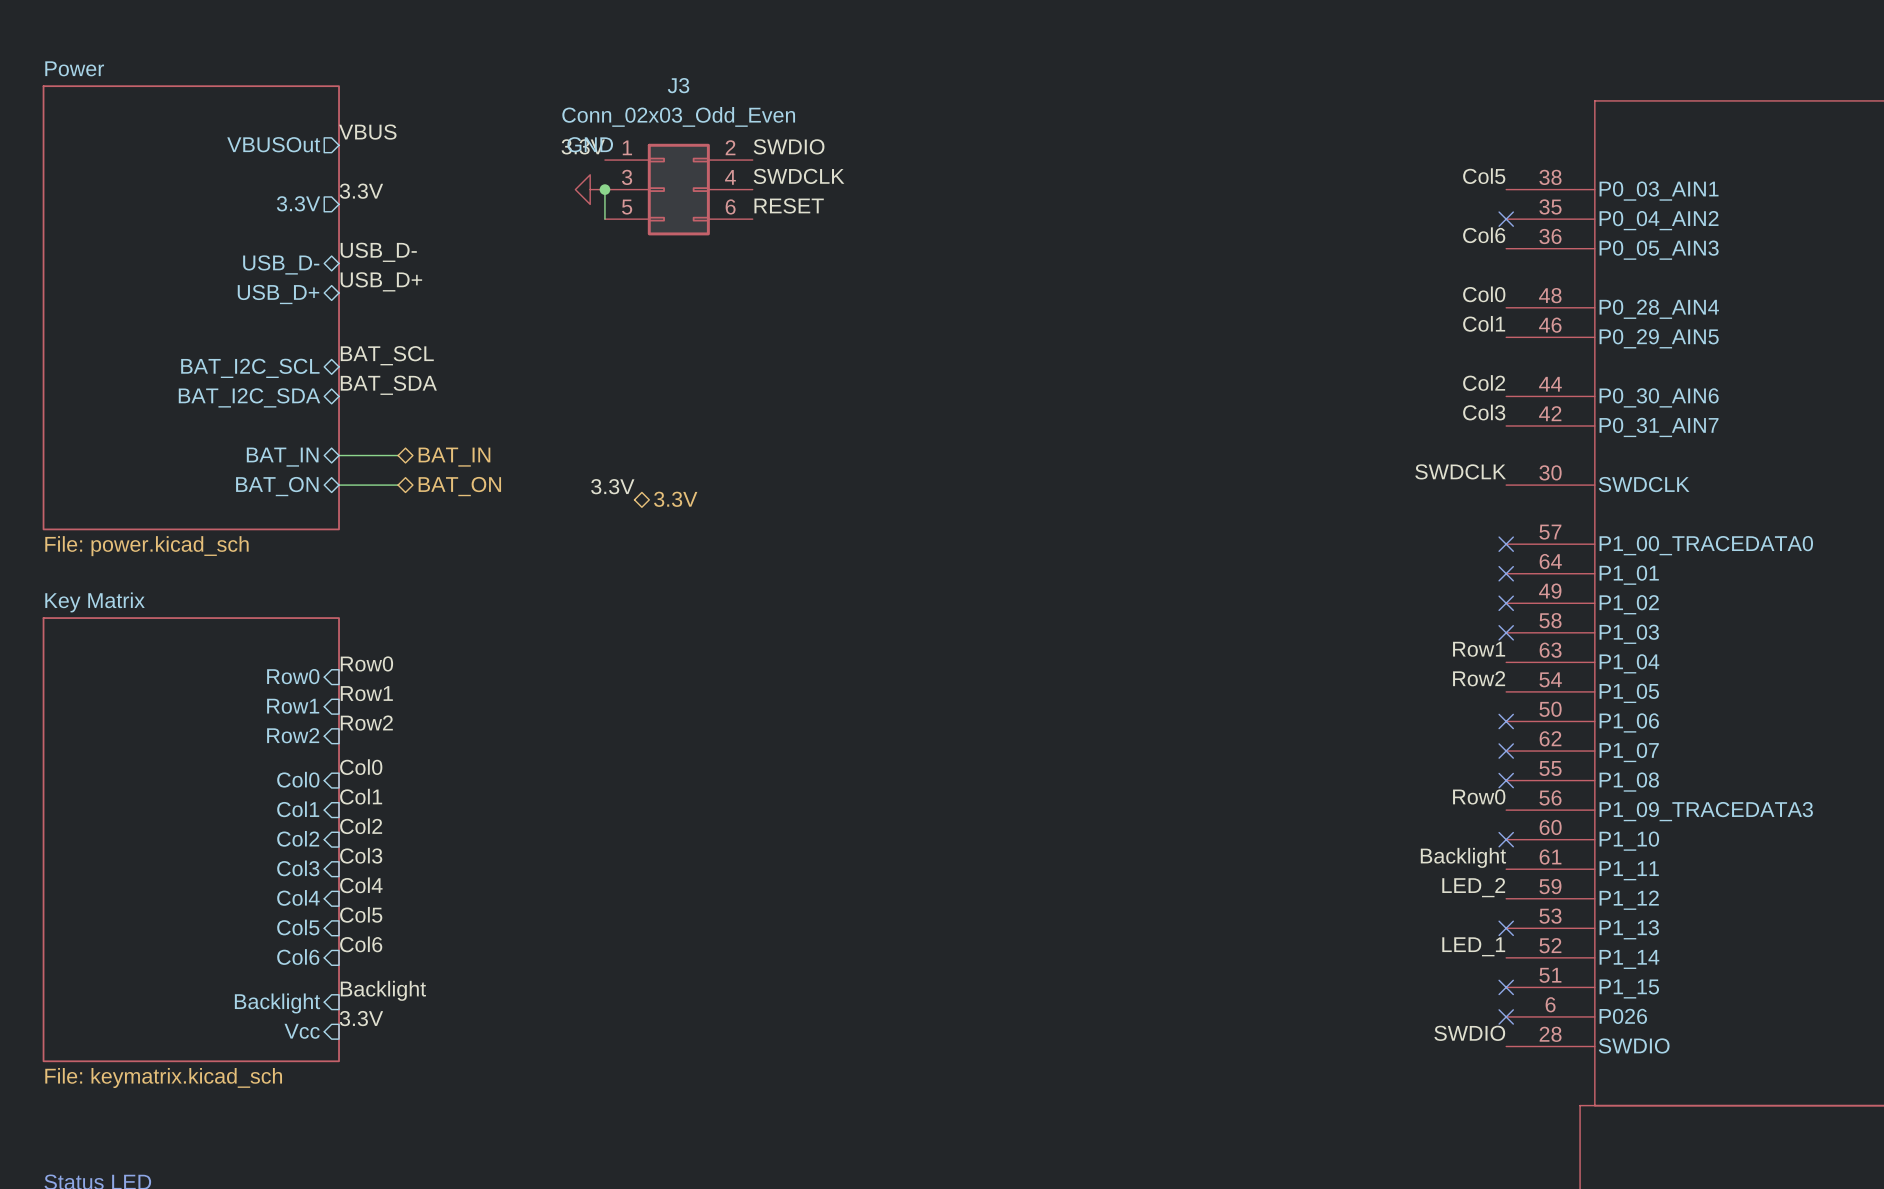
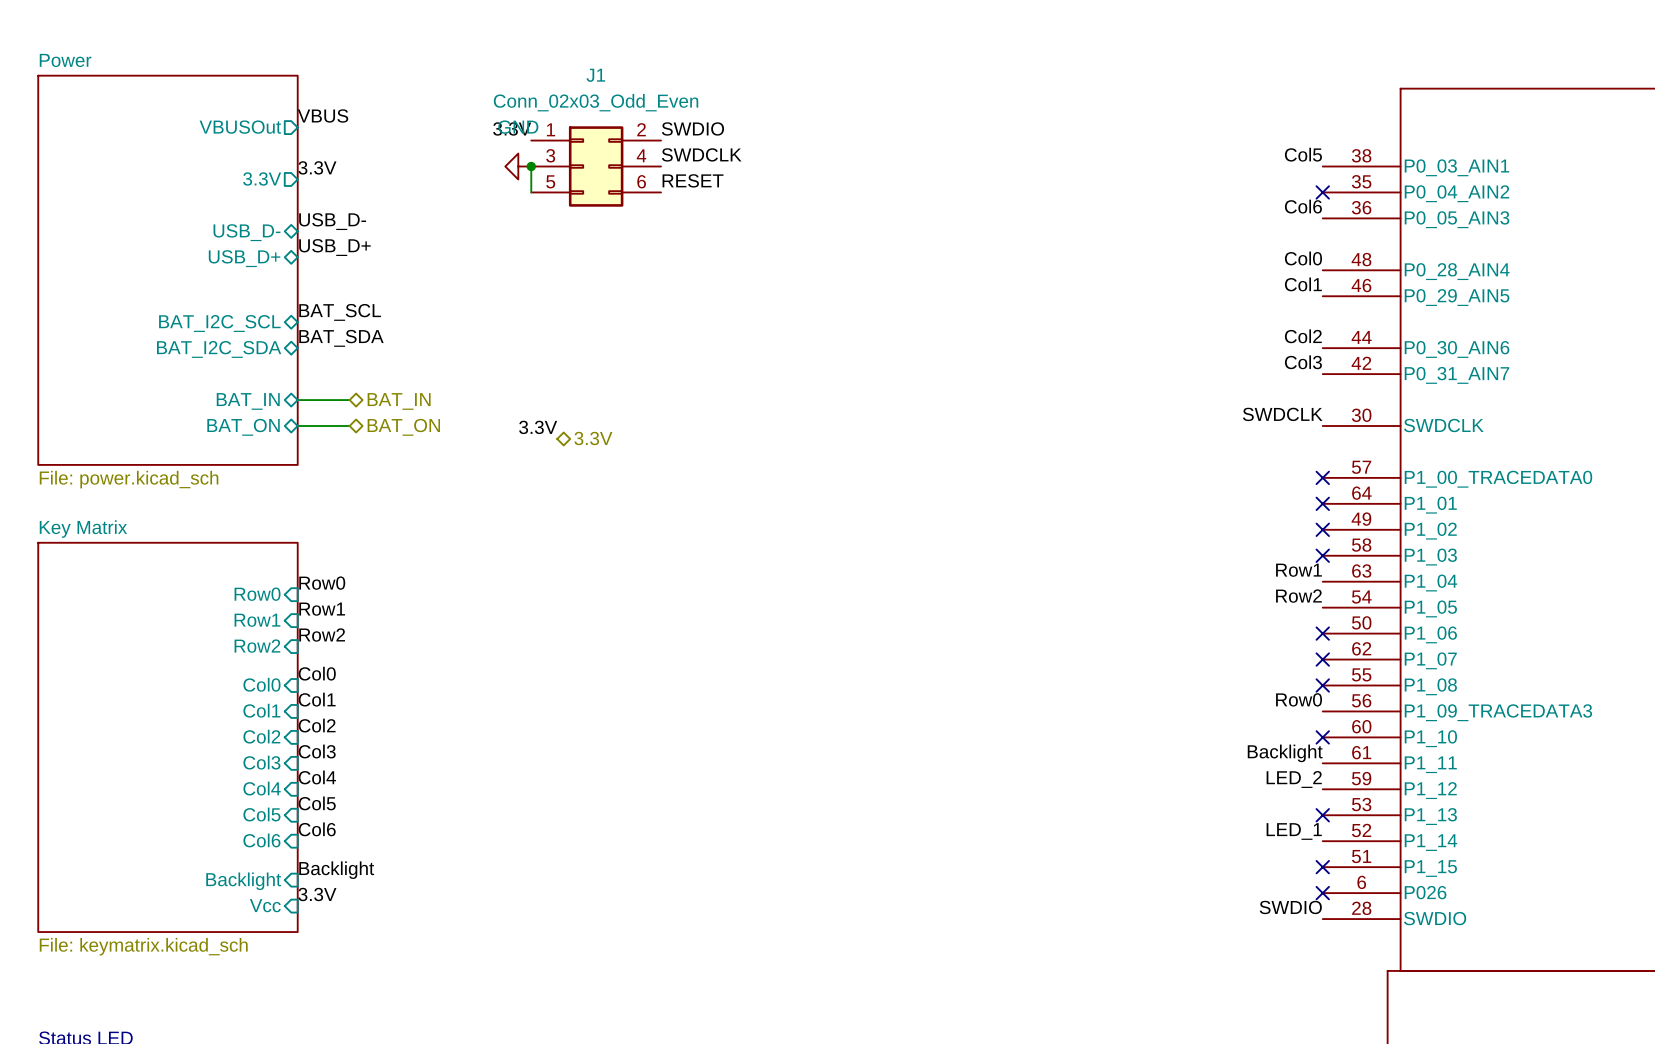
J3 name: J3 (678, 85) -> J1 (595, 75)

